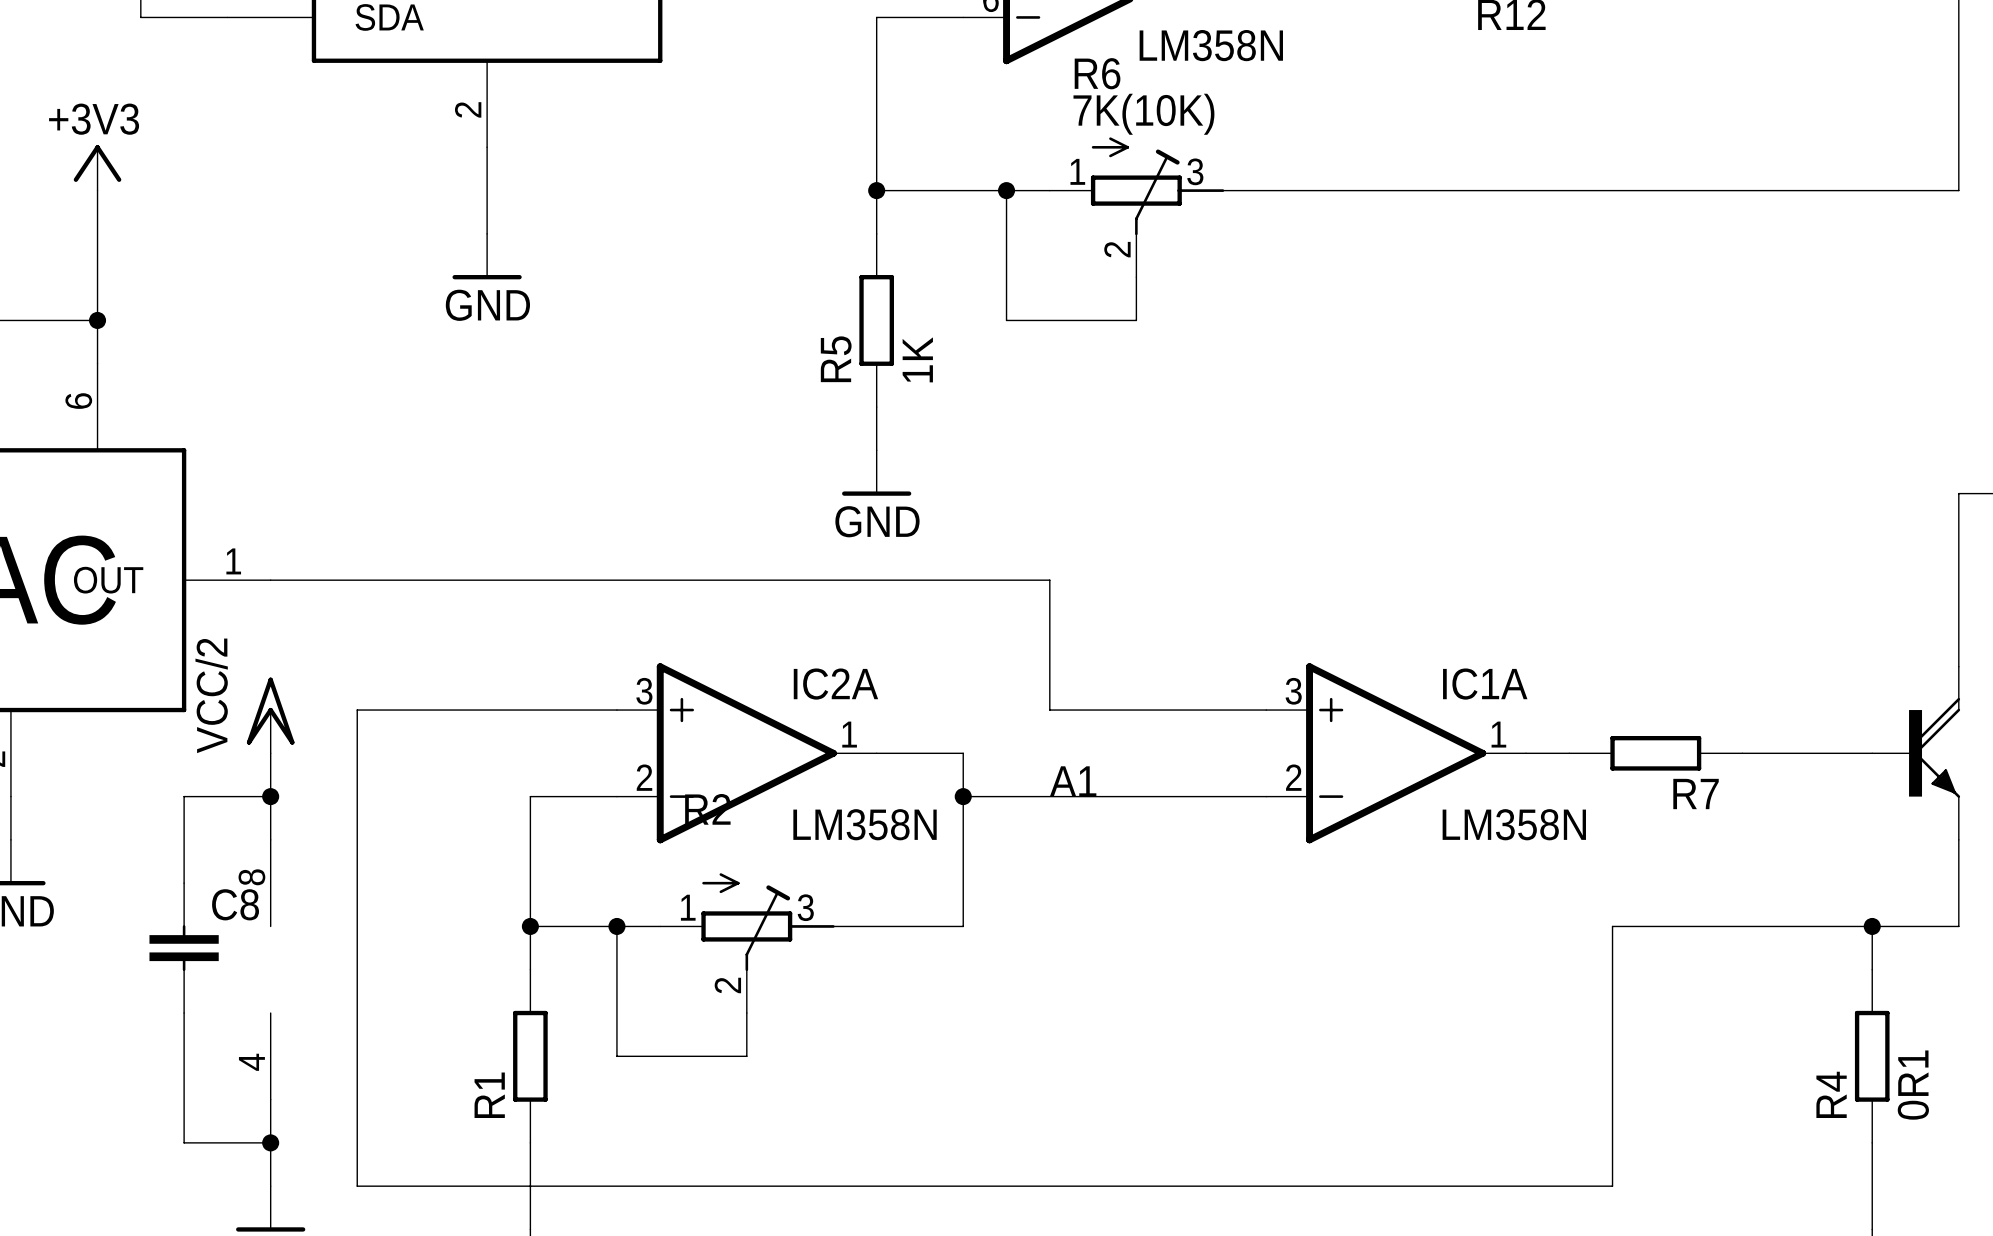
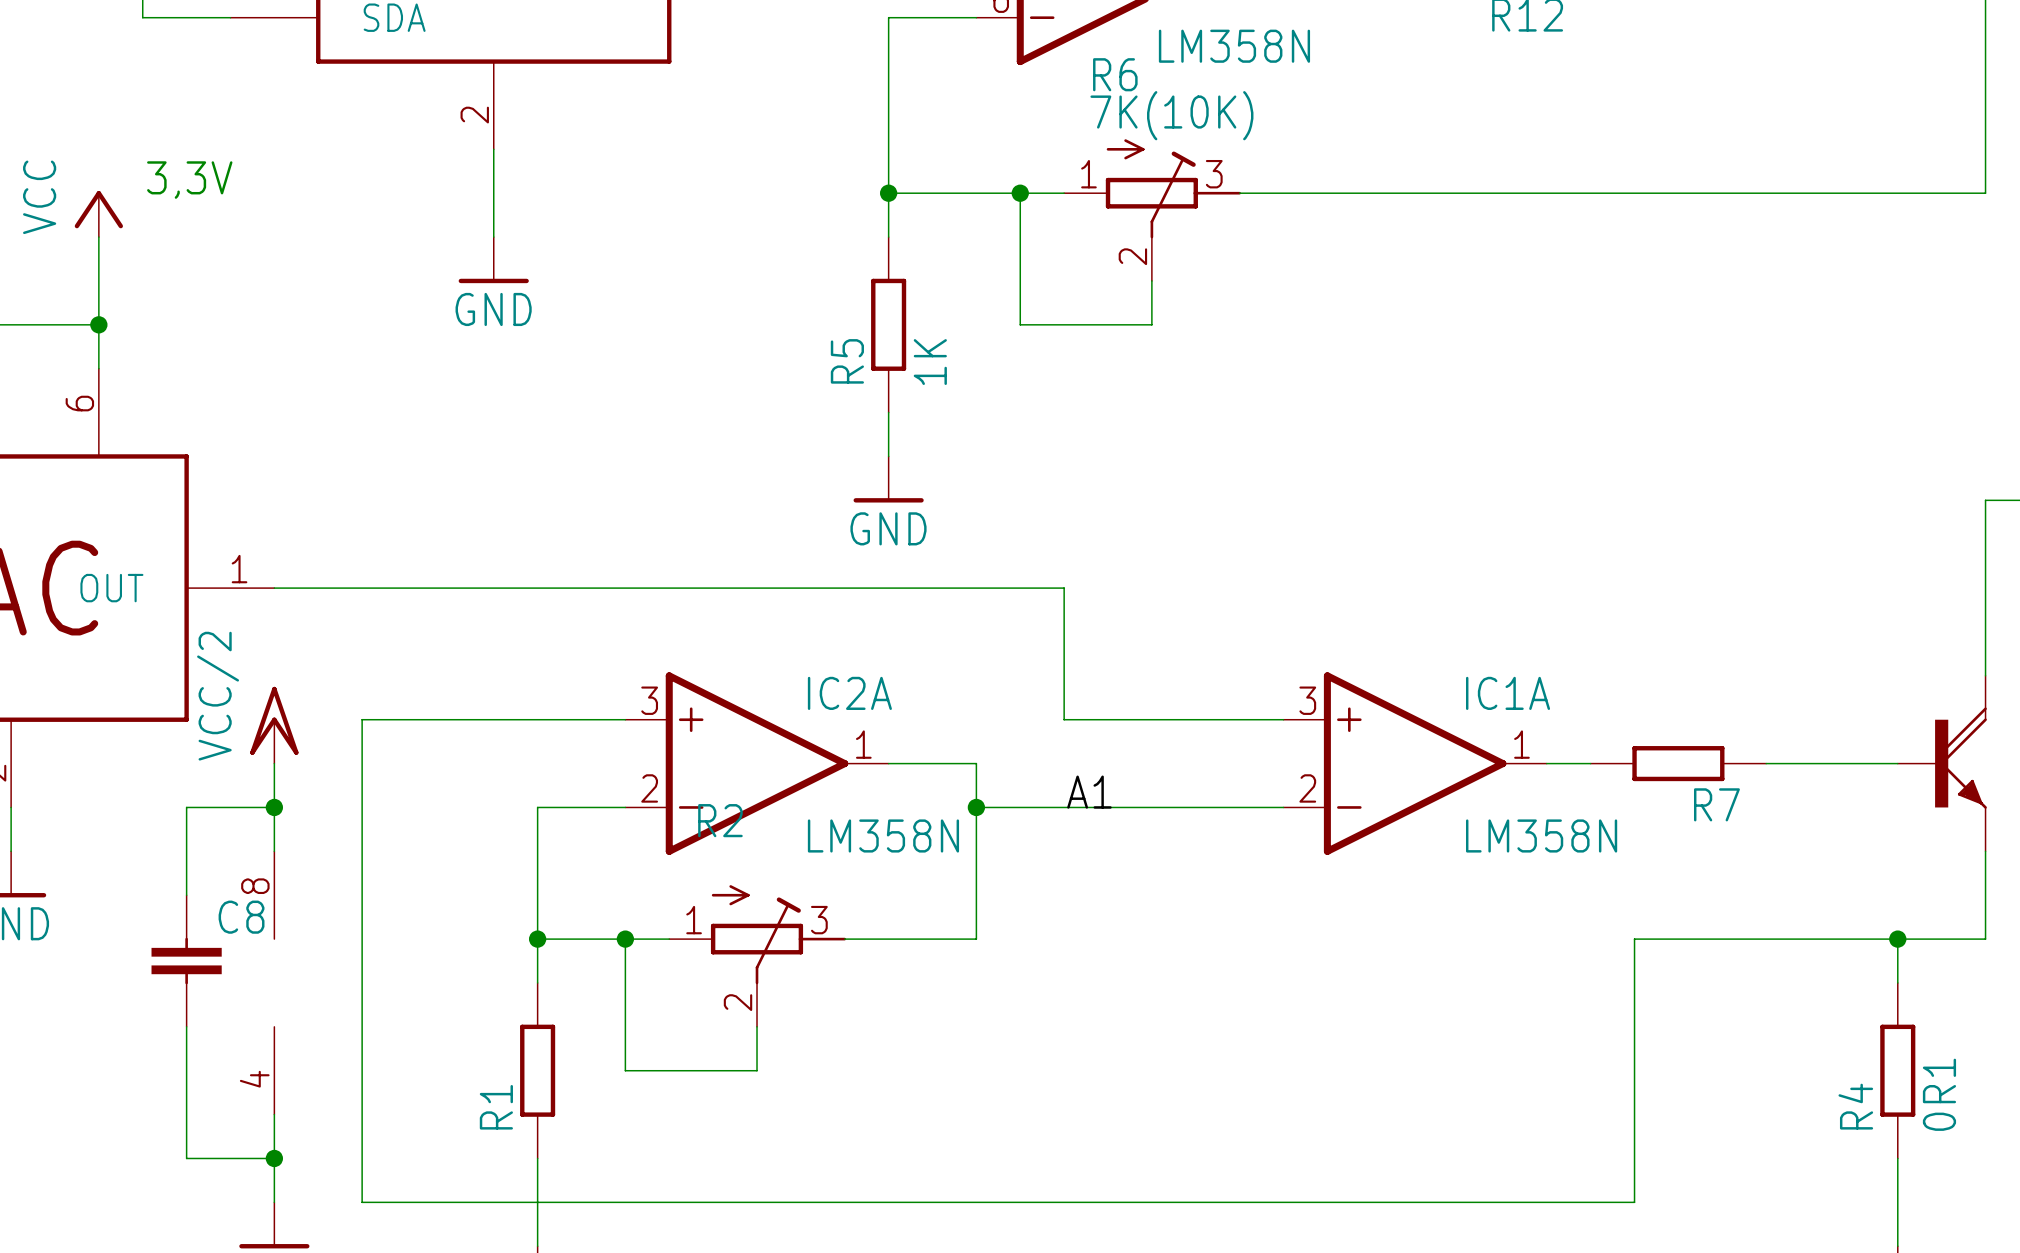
power symbol: +3V3 (97, 167) -> none
text: none -> 3,3V (189, 180)
power symbol: none -> VCC (98, 214)

